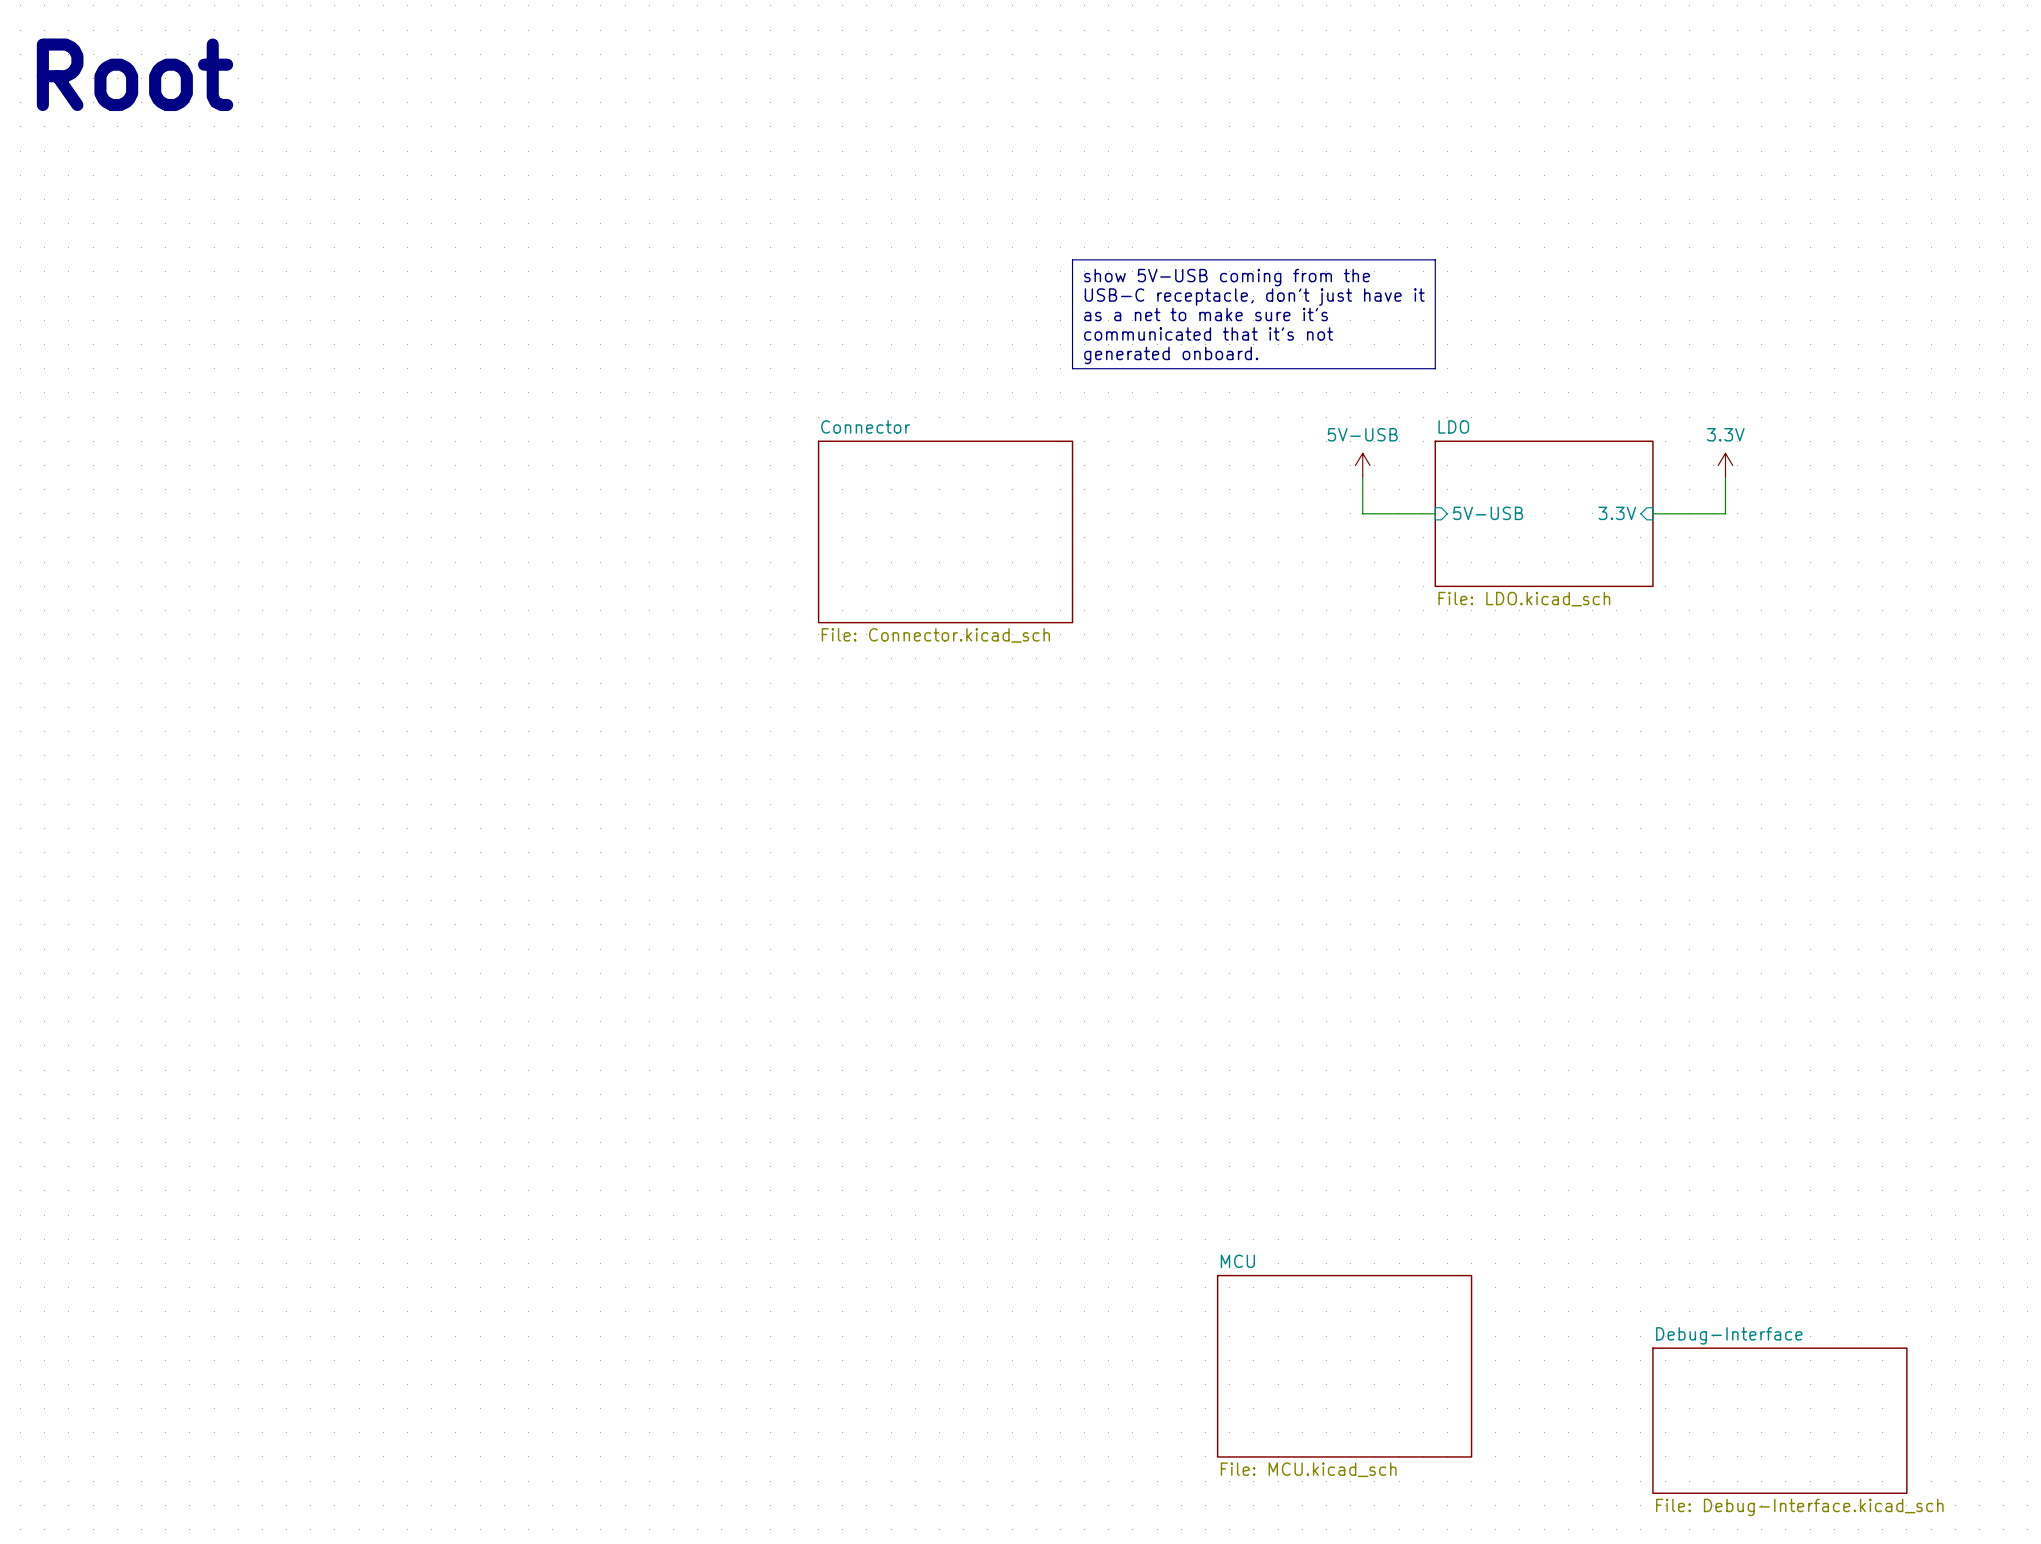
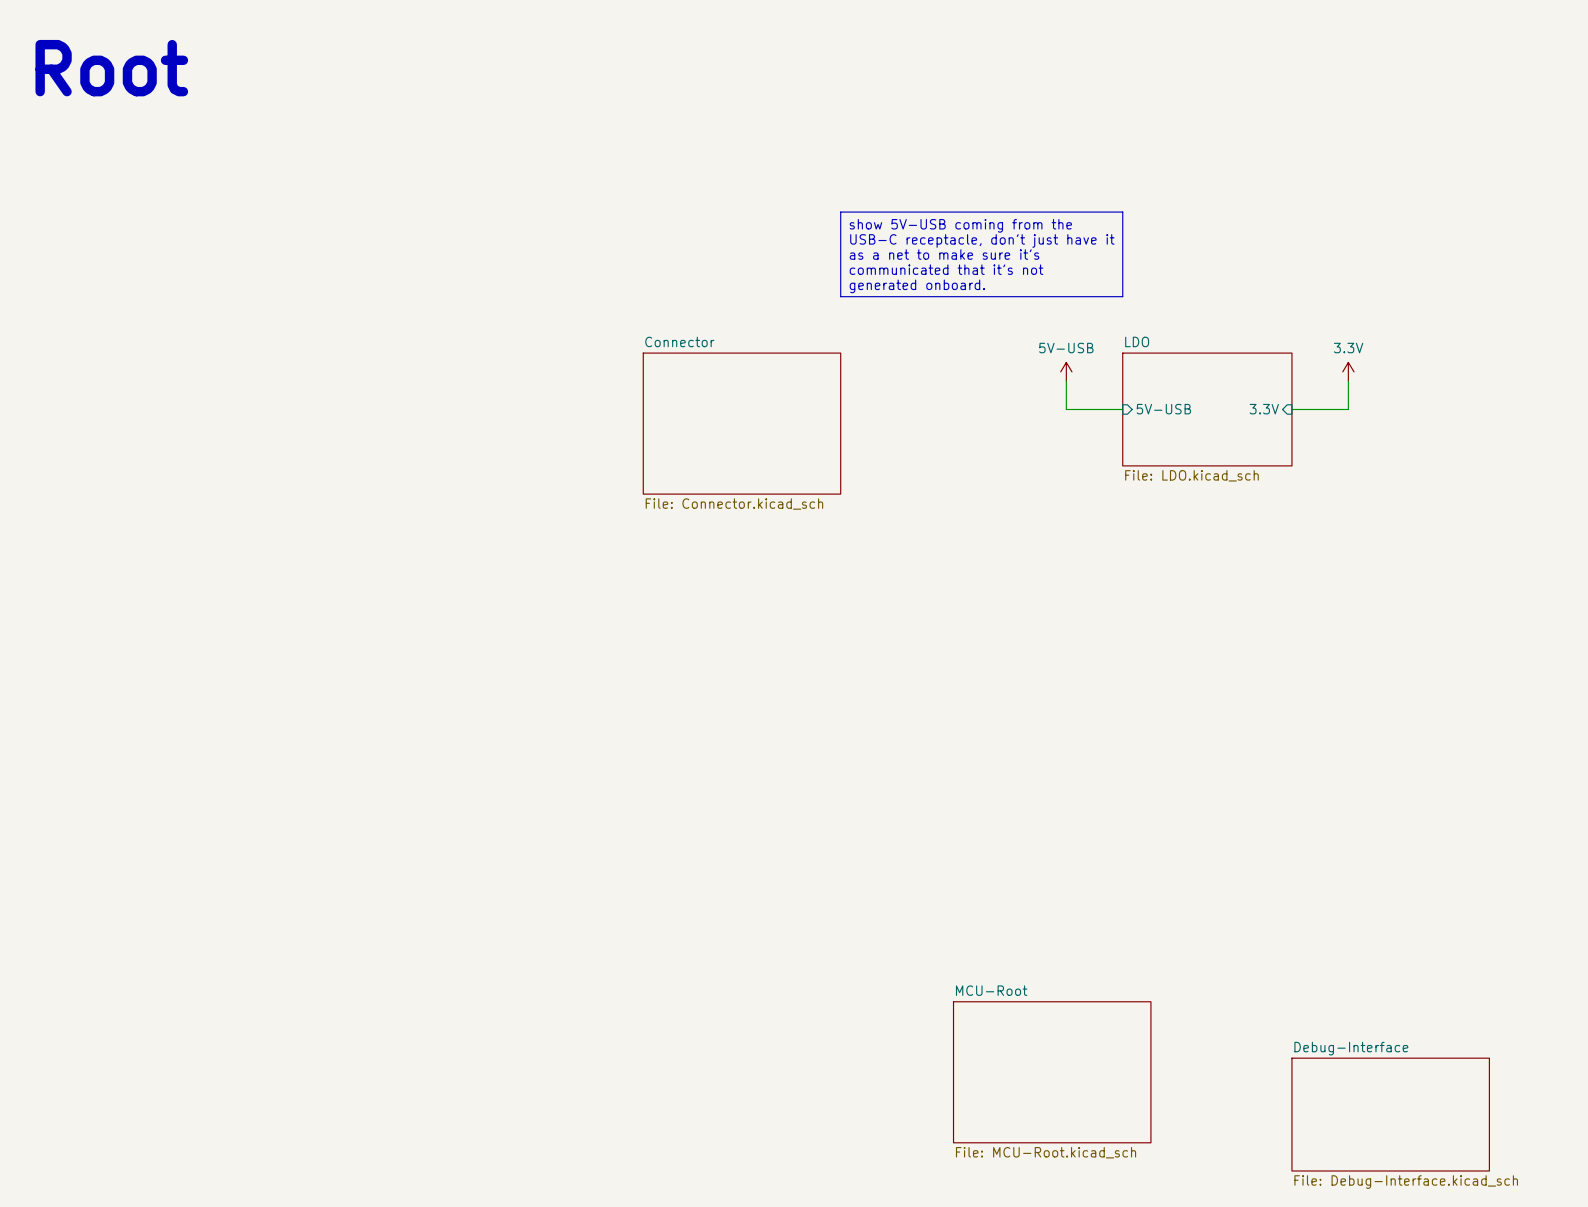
sheet MCU name: MCU (1237, 1261) -> MCU-Root (991, 990)
sheet MCU value: File: MCU.kicad_sch (1308, 1469) -> File: MCU-Root.kicad_sch (1046, 1152)

